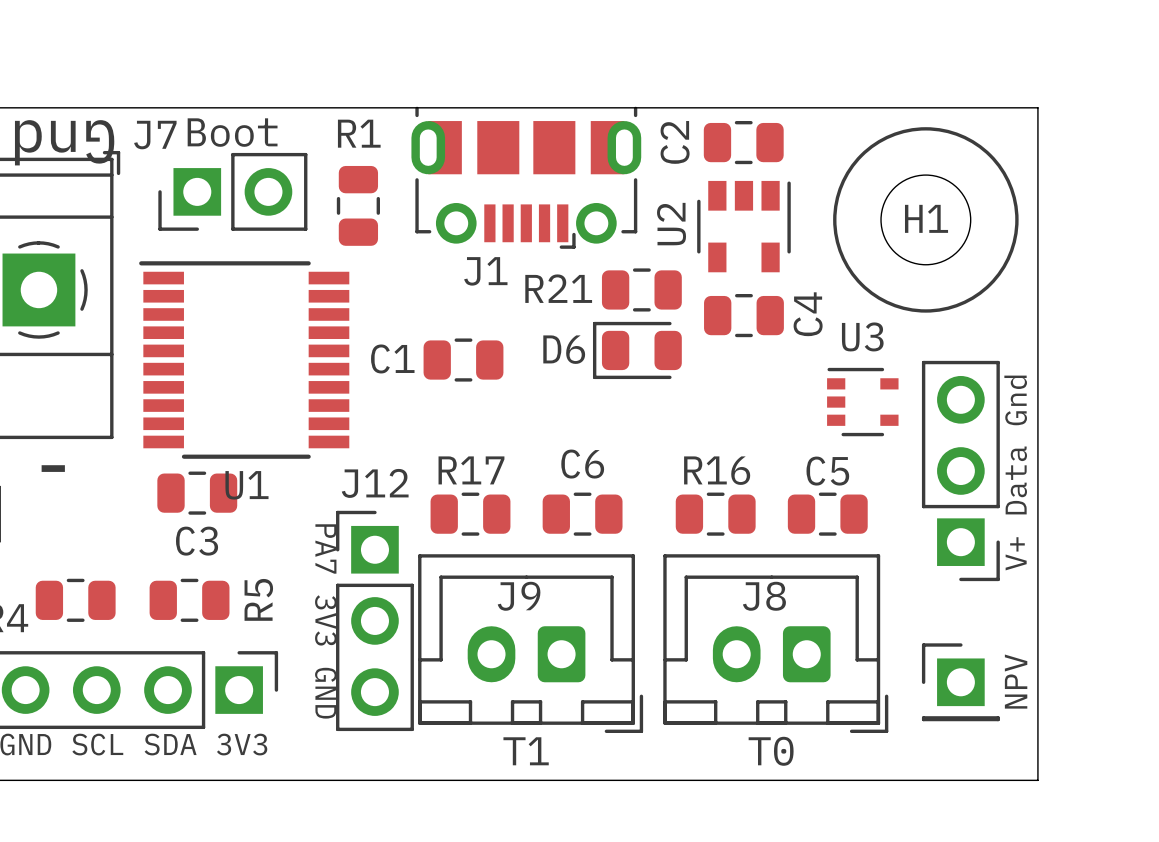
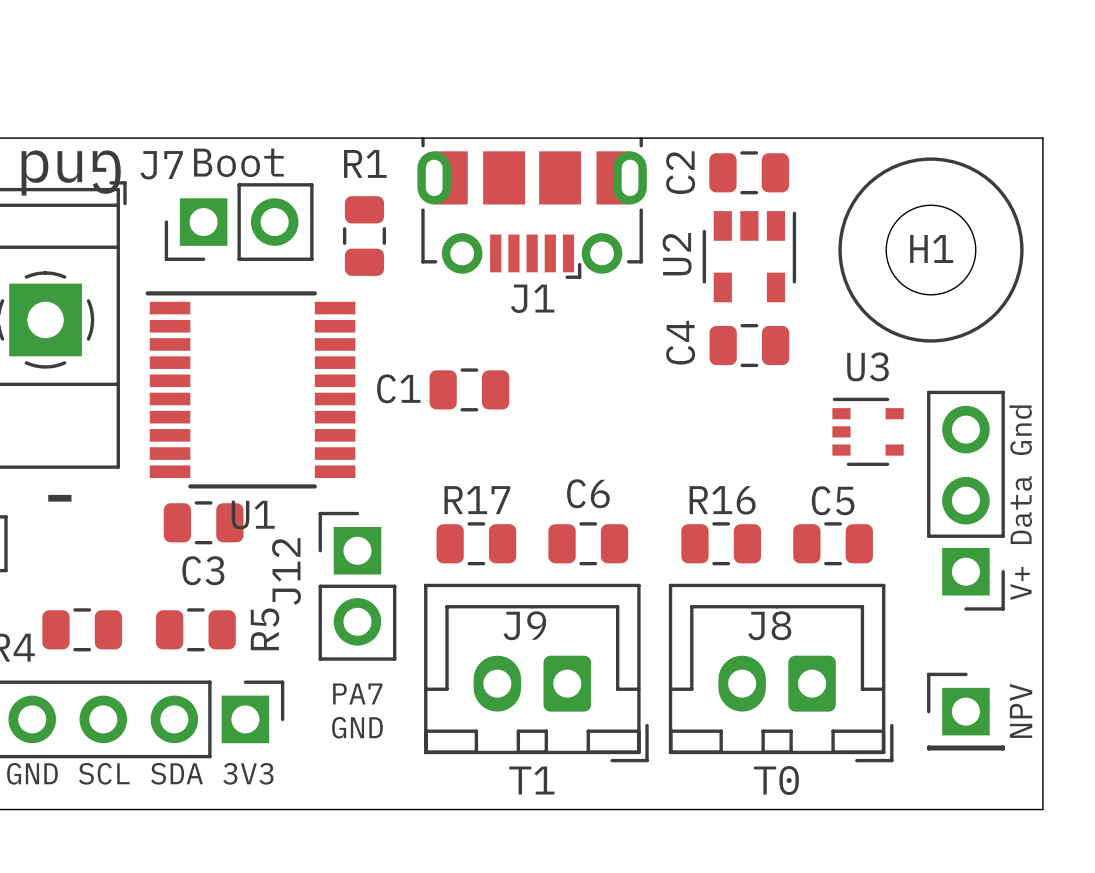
J1 name position: J1 (485, 271) -> J1 (532, 298)
R21: (641, 289) -> none
C4 name position: C4 (808, 314) -> C4 (680, 342)
D6: (637, 350) -> none
J12 name position: J12 (375, 483) -> J12 (286, 571)
J12 footprint: [336, 510, 414, 732] -> [318, 511, 397, 661]
text: PA7 3V3 GND (325, 621) -> none
text: none -> PA7 (357, 693)
text: none -> GND (357, 727)

